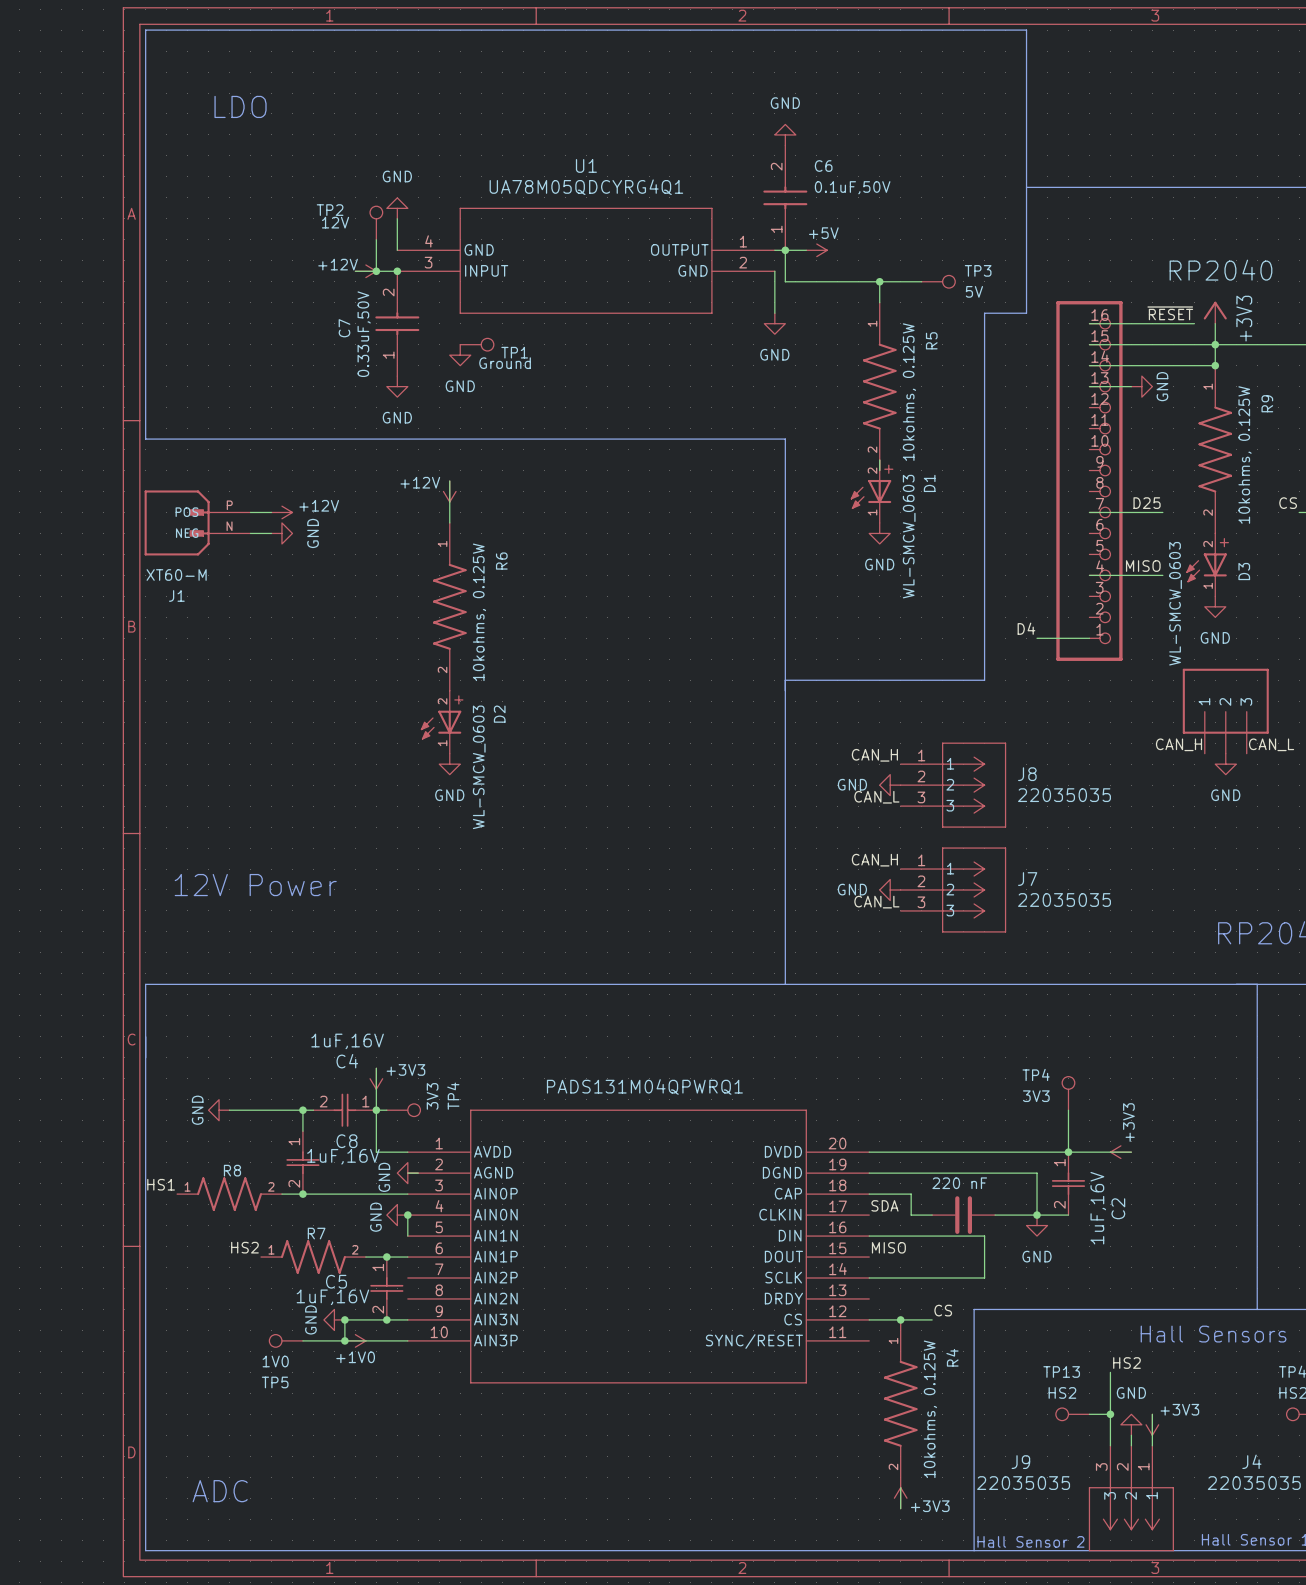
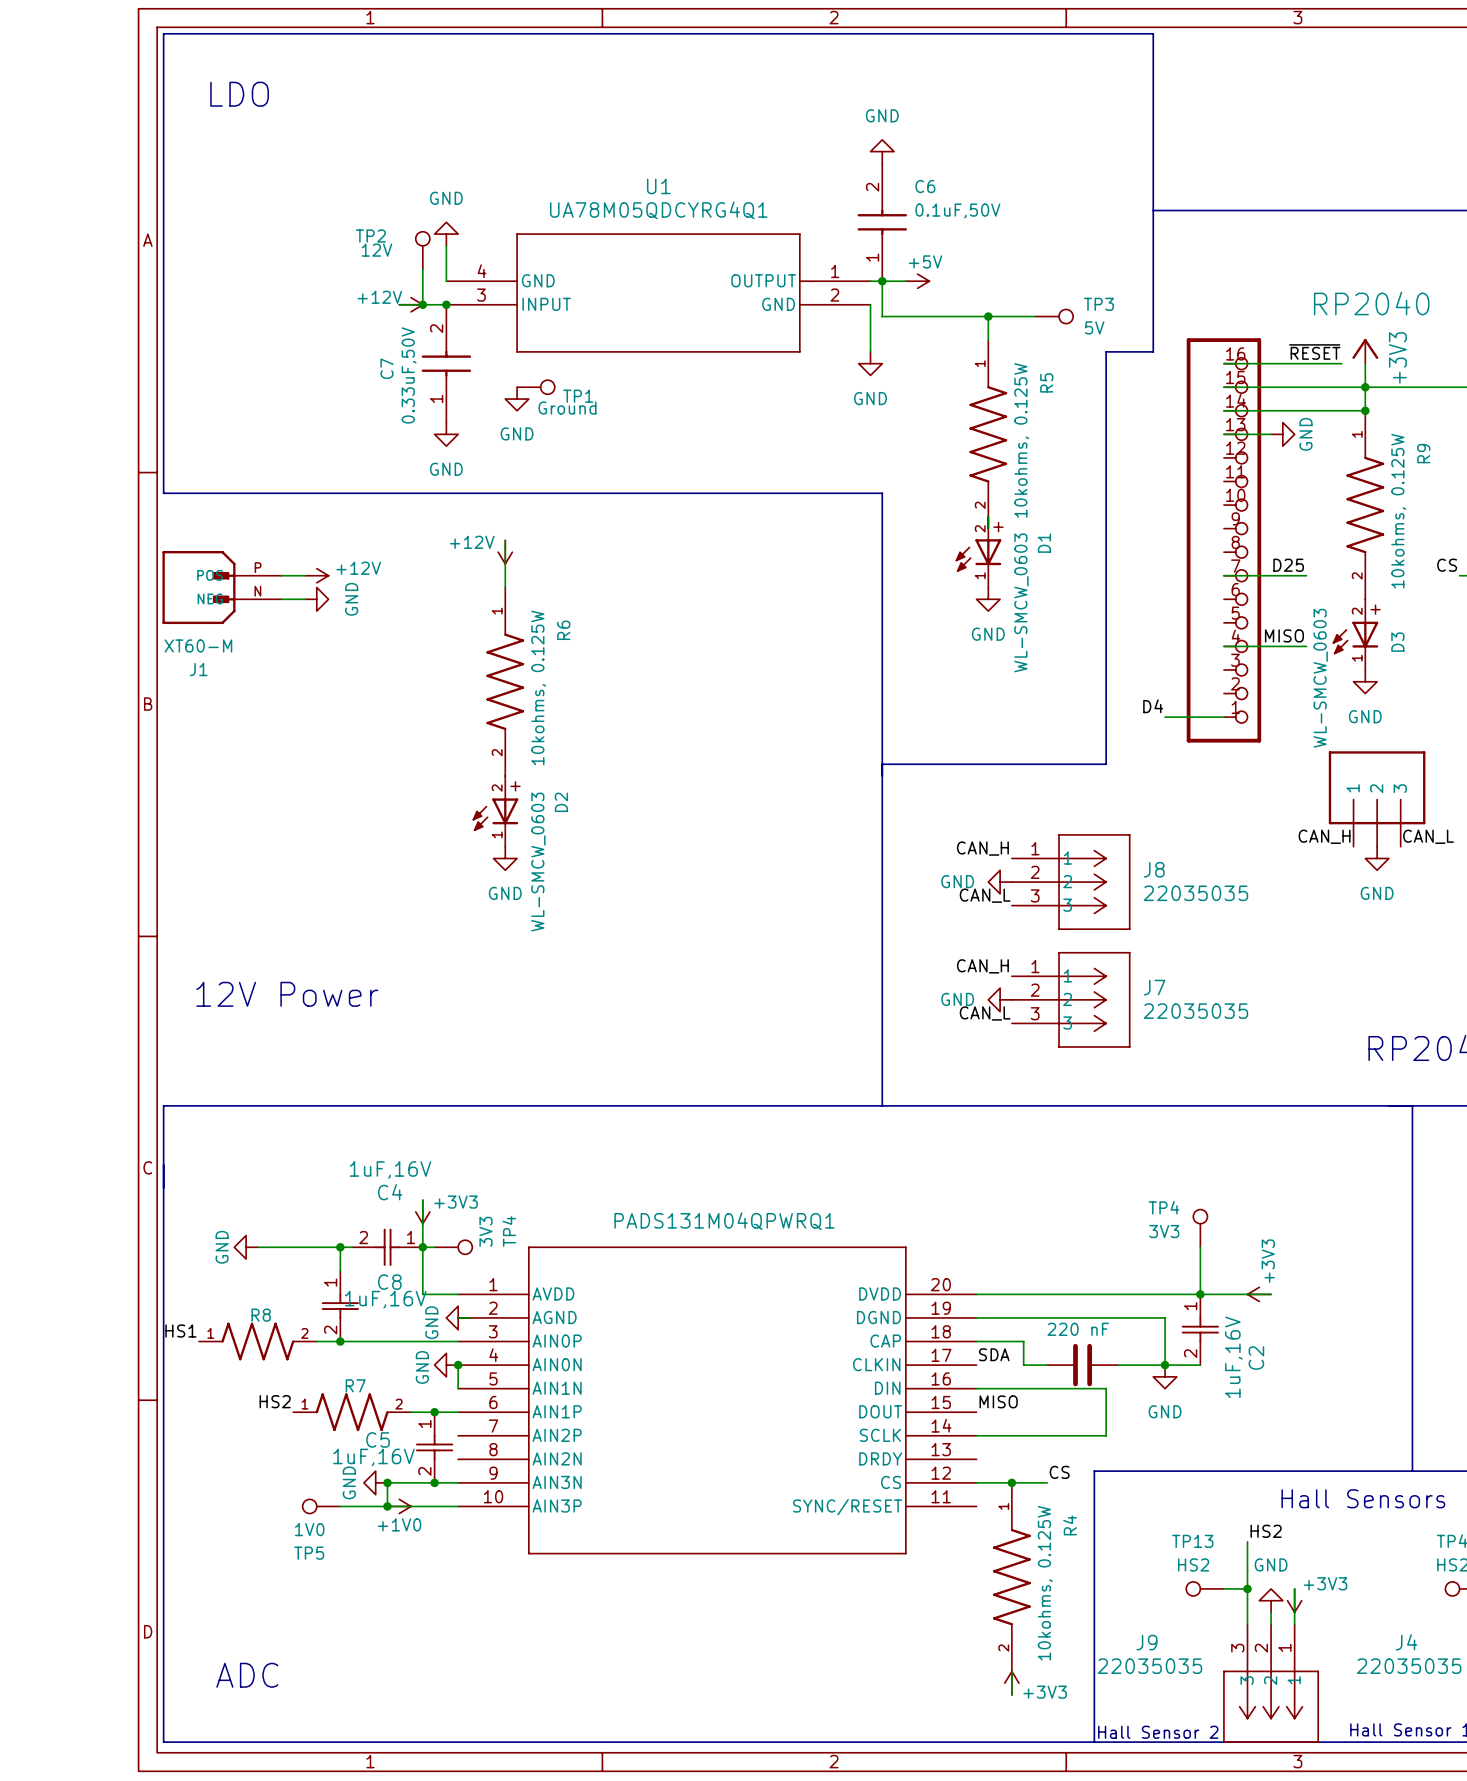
text position: LDO (240, 106) -> LDO (239, 94)

